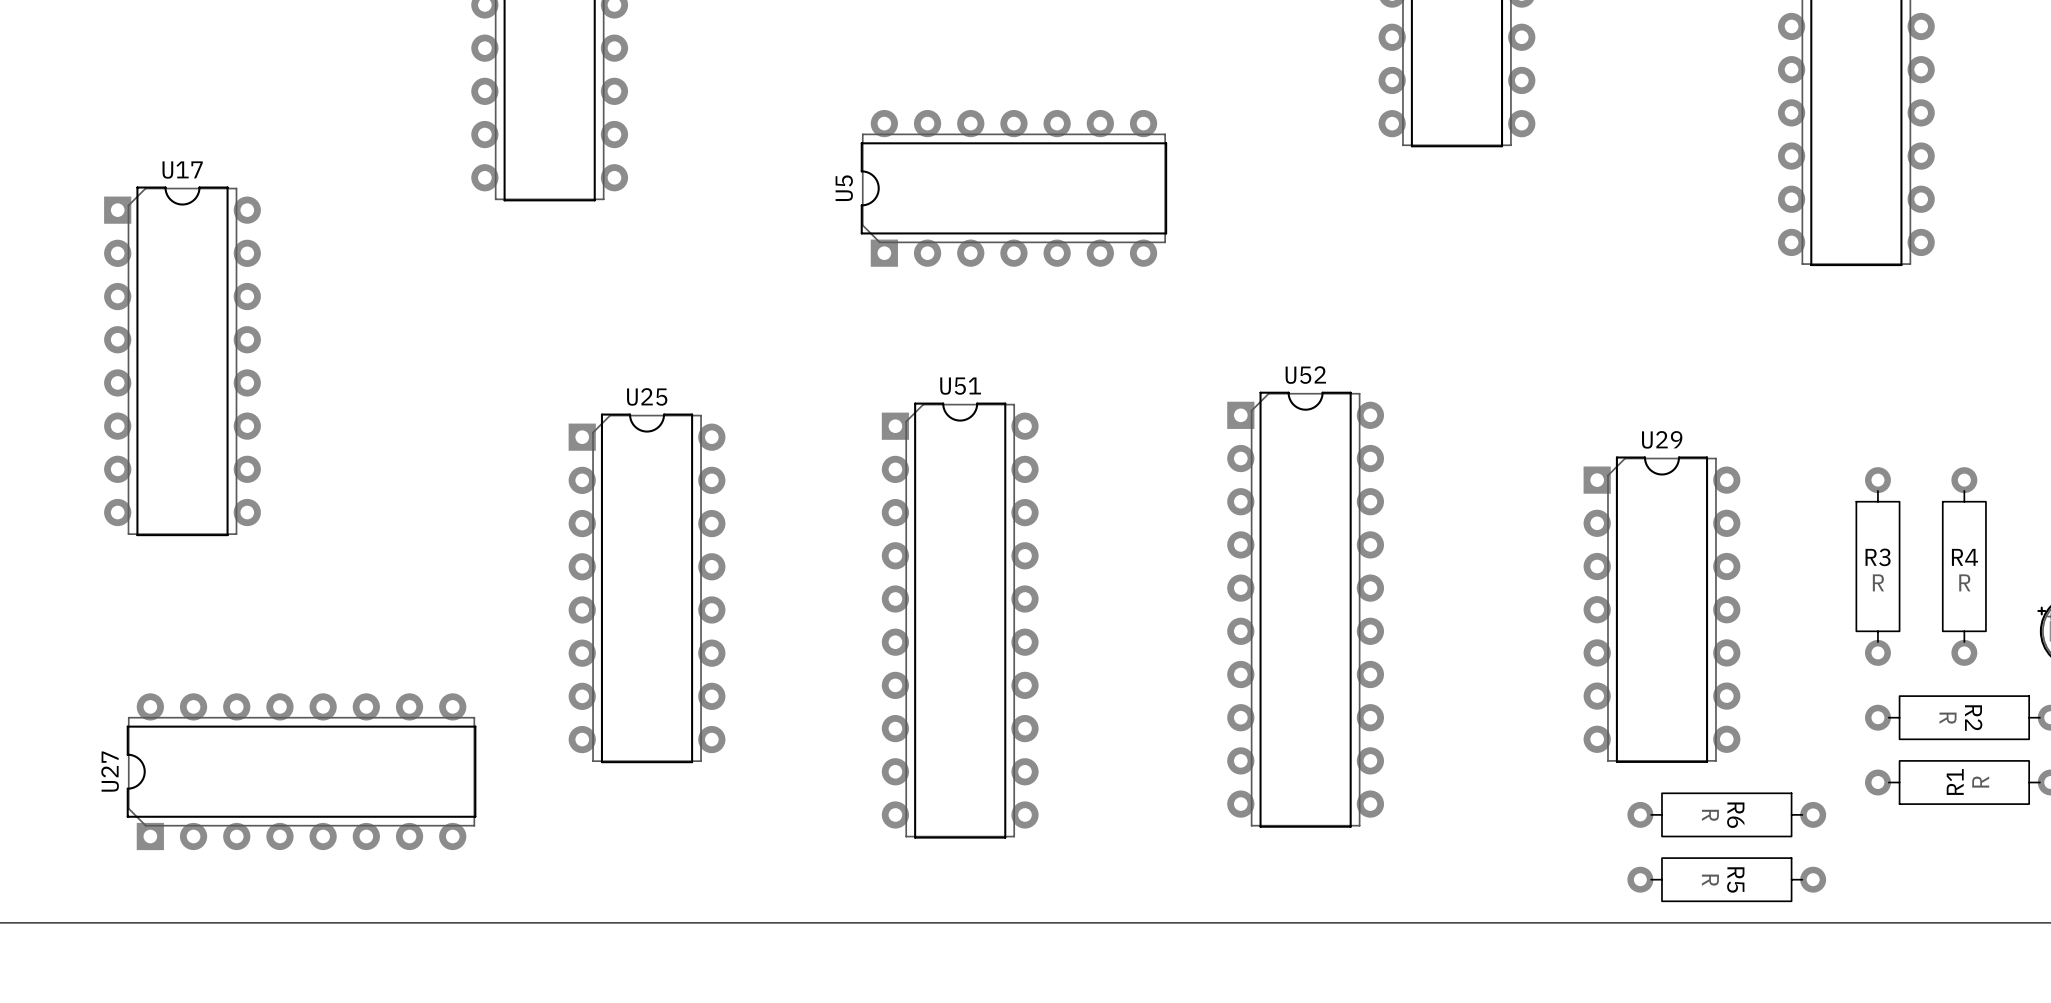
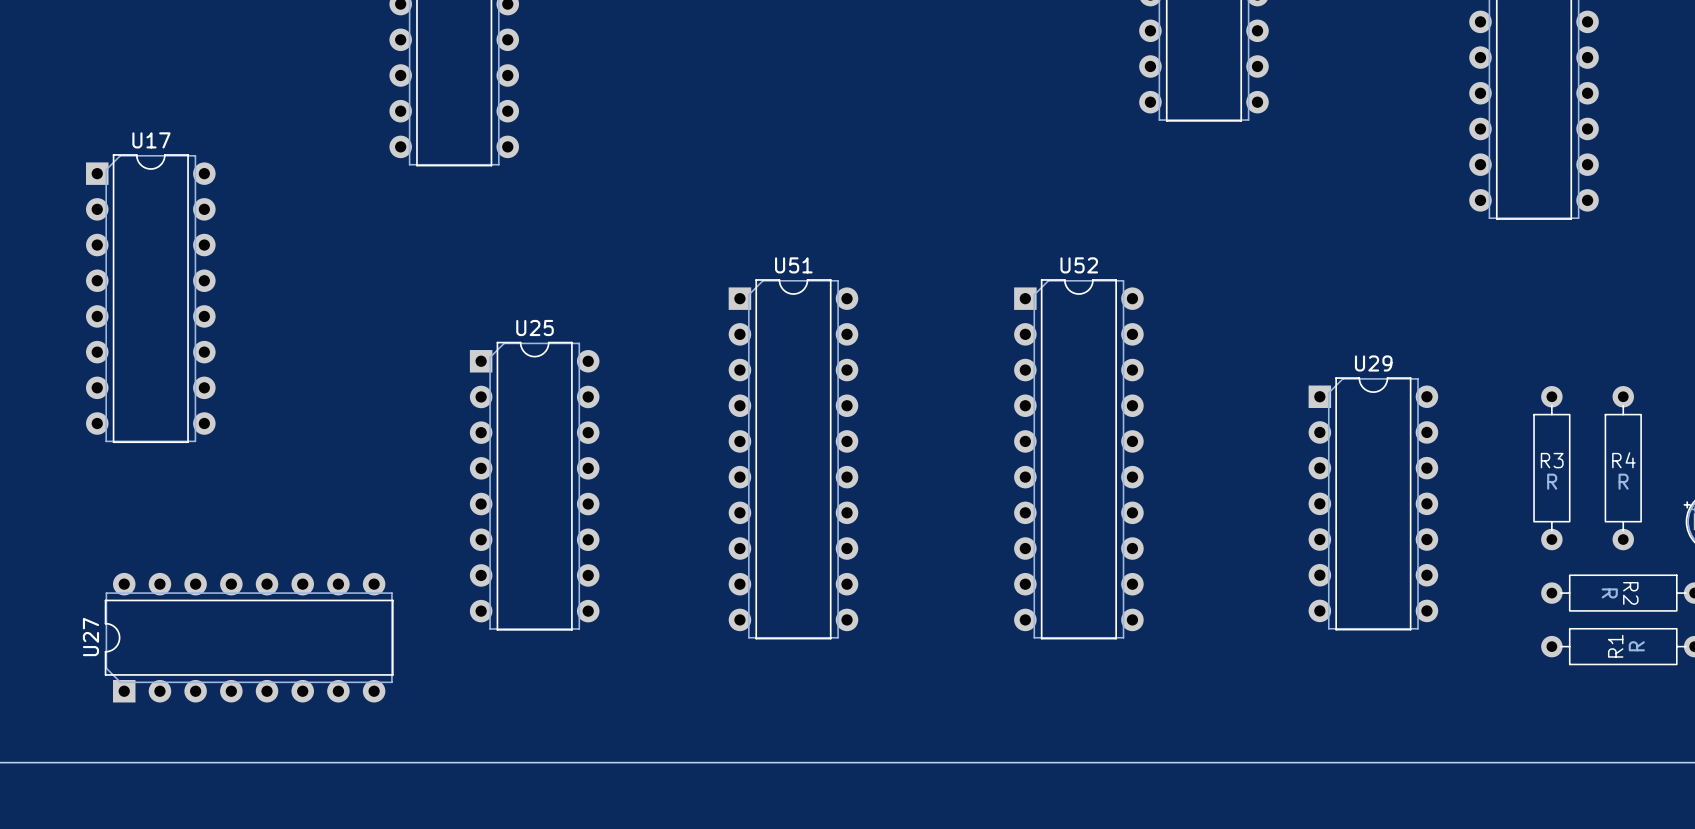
U5: (1013, 188) -> none
U52 position: (1305, 609) -> (1078, 459)
U51 position: (960, 620) -> (793, 459)
R6: R (1726, 814) -> none
R5: R (1726, 879) -> none

